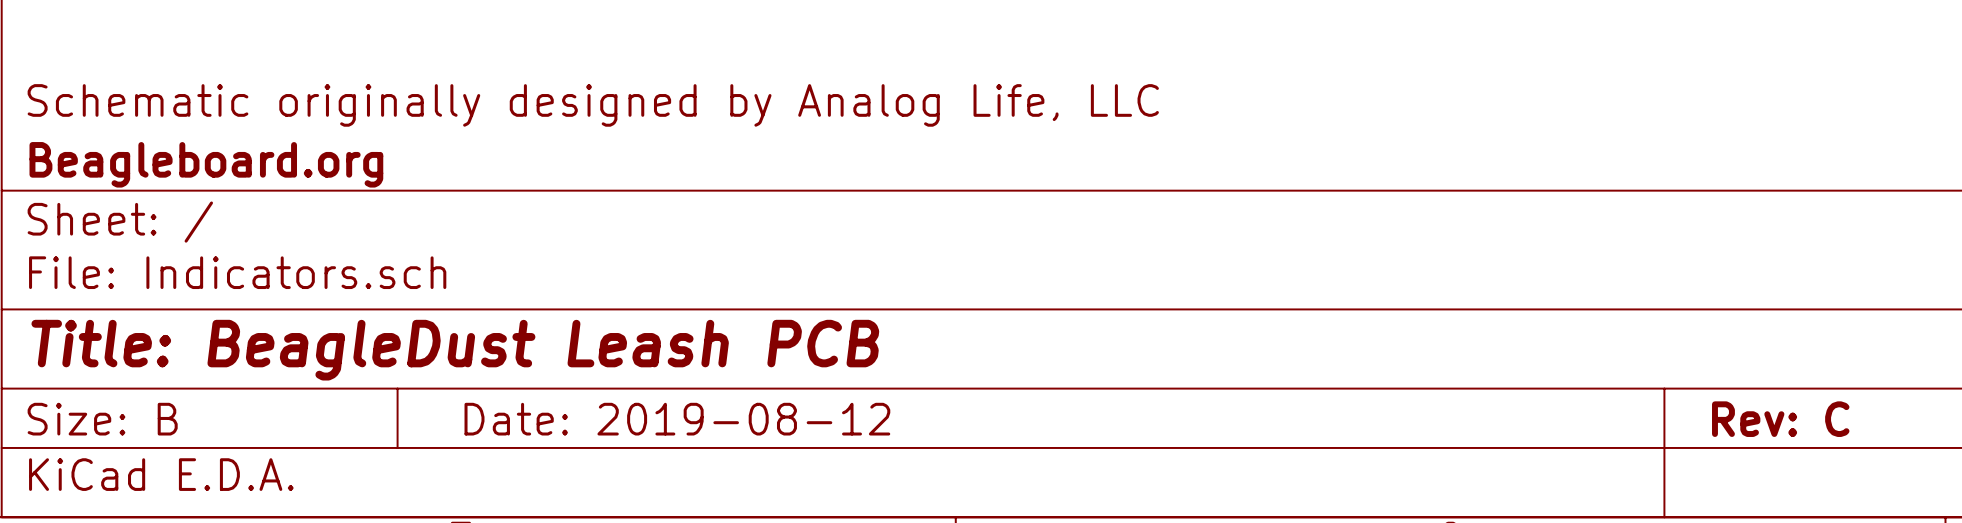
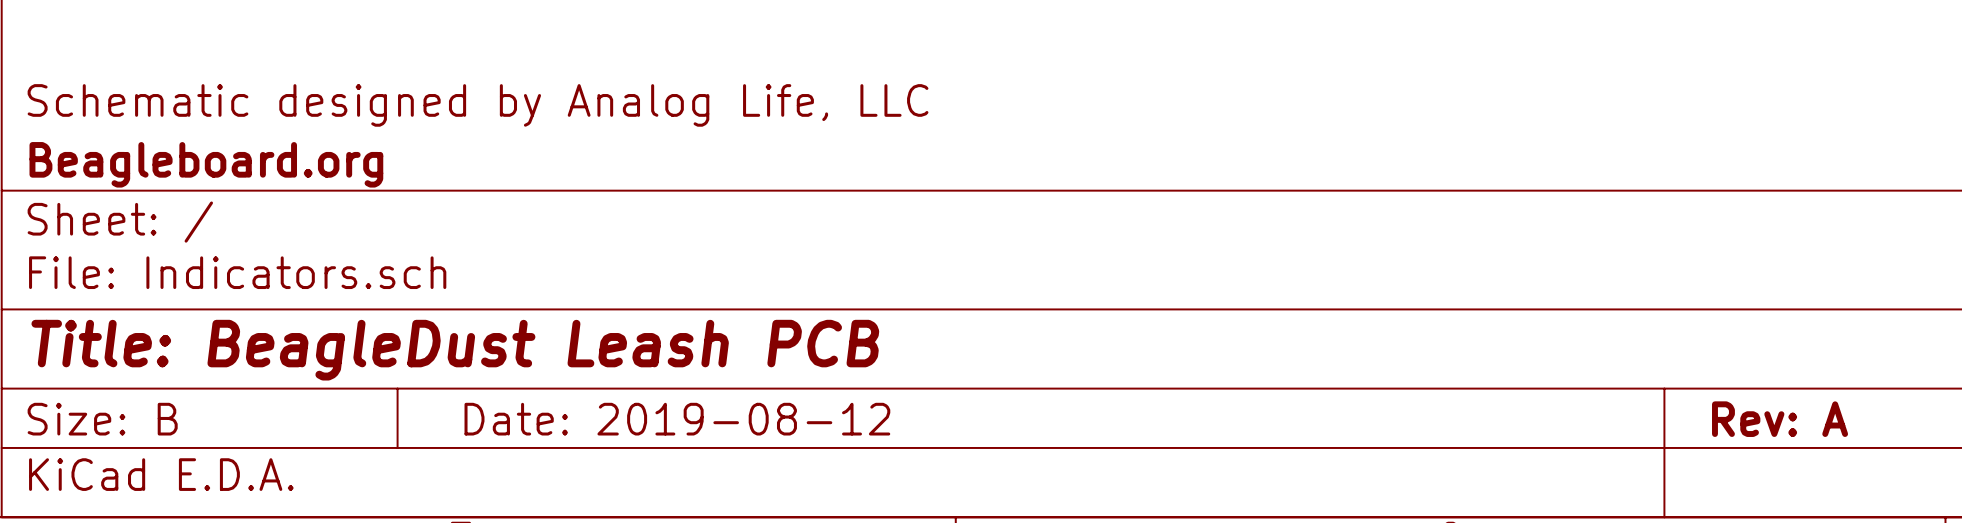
title block: Schematic originally designed by Analog Life, LLC (593, 105) -> Schematic designed by Analog Life, LLC (478, 105)
title block: Rev: C (1780, 419) -> Rev: A (1780, 419)

